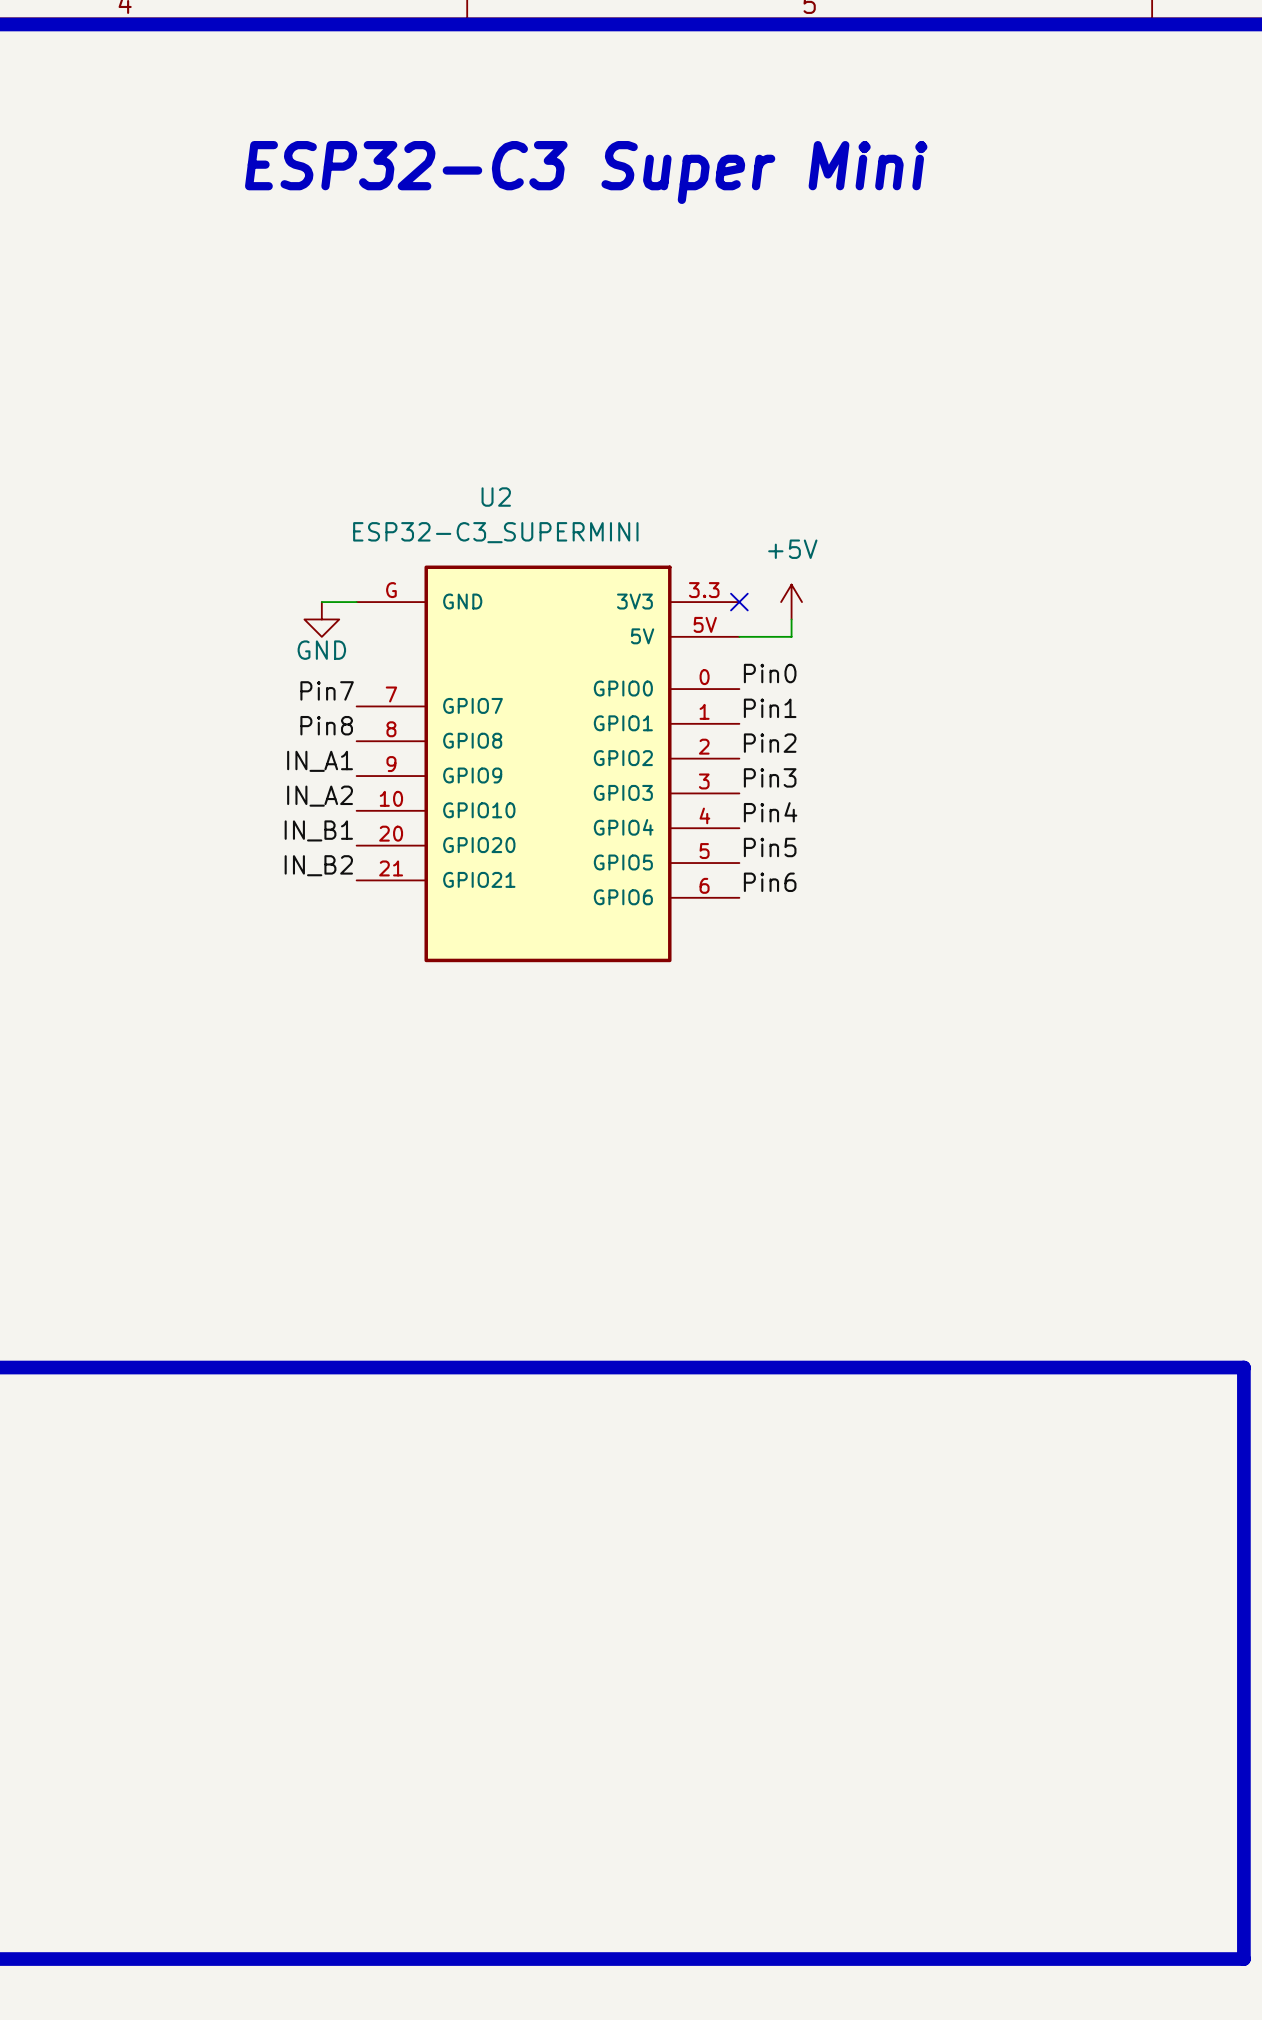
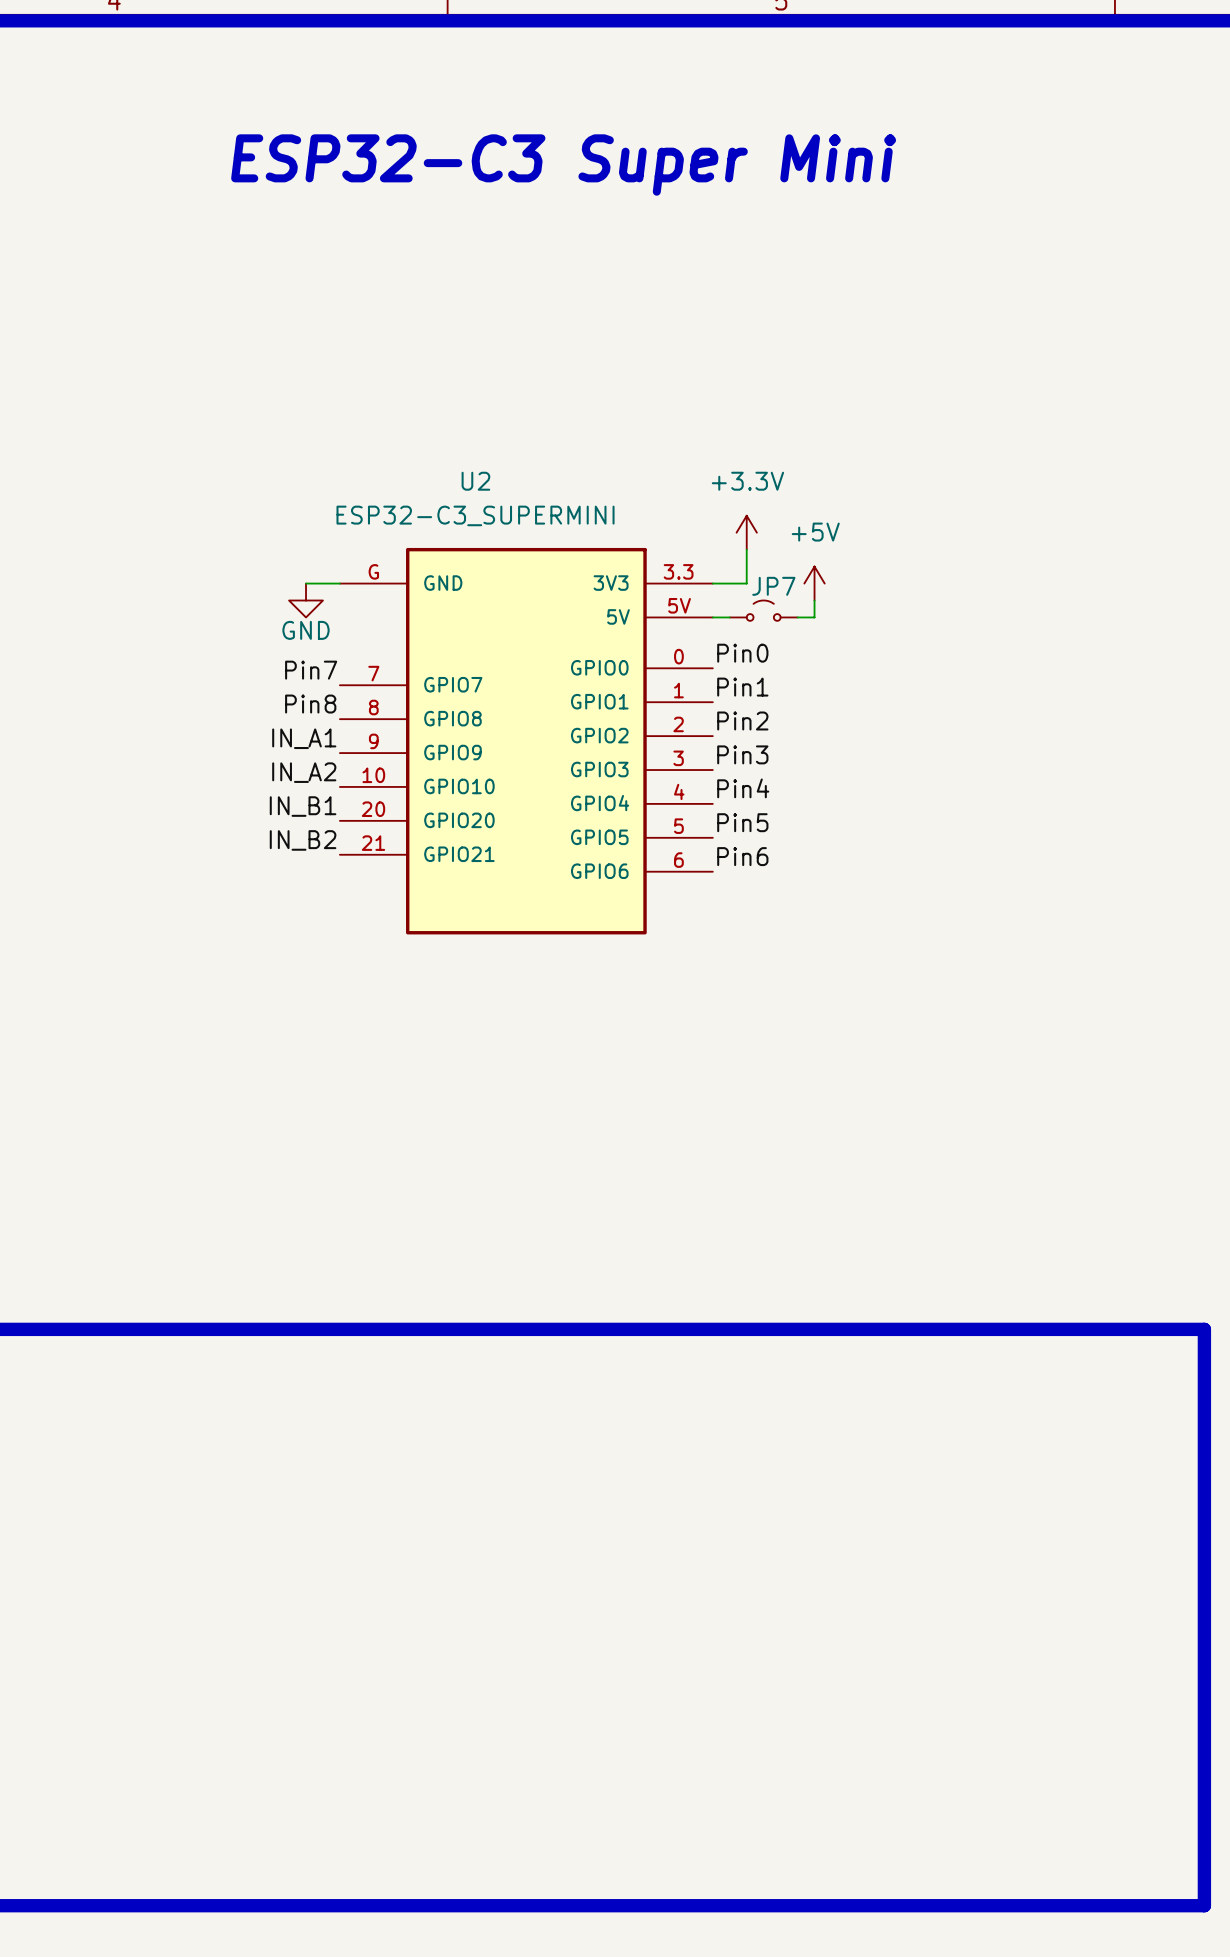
power symbol: none -> +3.3V (746, 532)
wire: none -> (746, 549) (746, 583) (712, 583)
no-connect mark: (739, 602) -> none
power symbol position: +5V (791, 602) -> +5V (814, 583)
wire: (791, 619) (791, 636) (756, 636) -> none
wire: none -> (814, 600) (814, 617) (797, 617)
JP7: none -> (763, 610)

